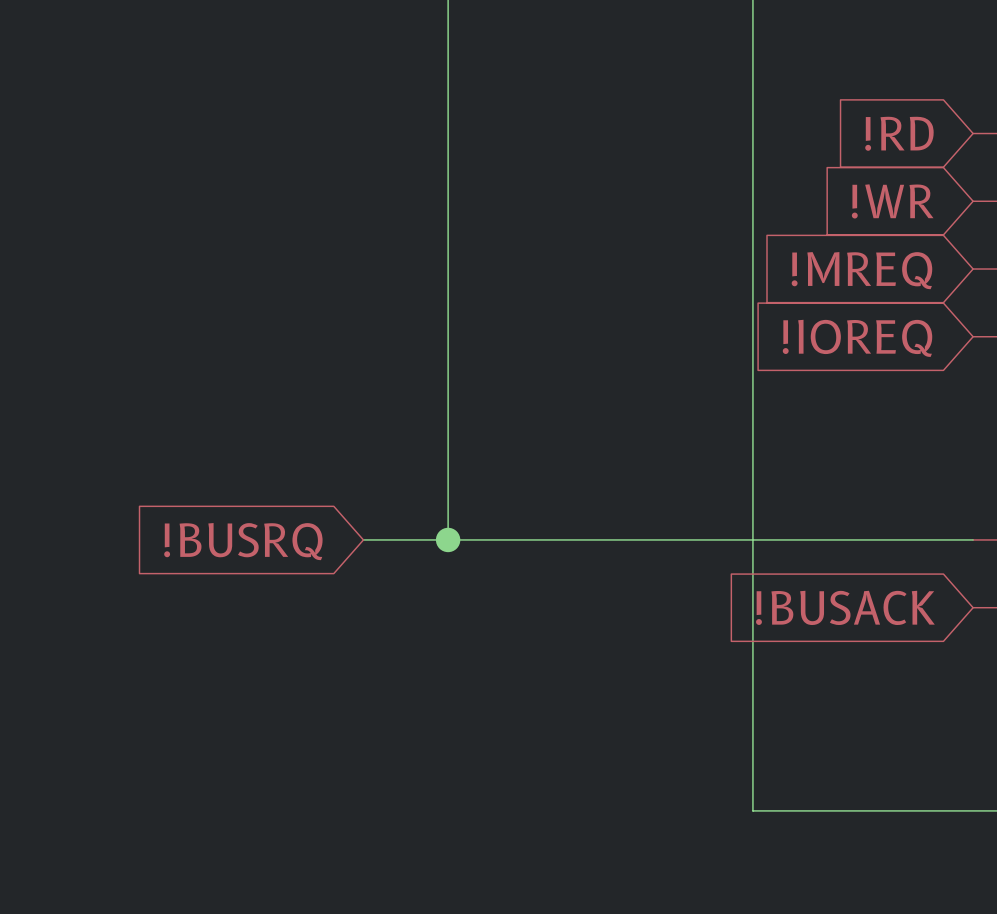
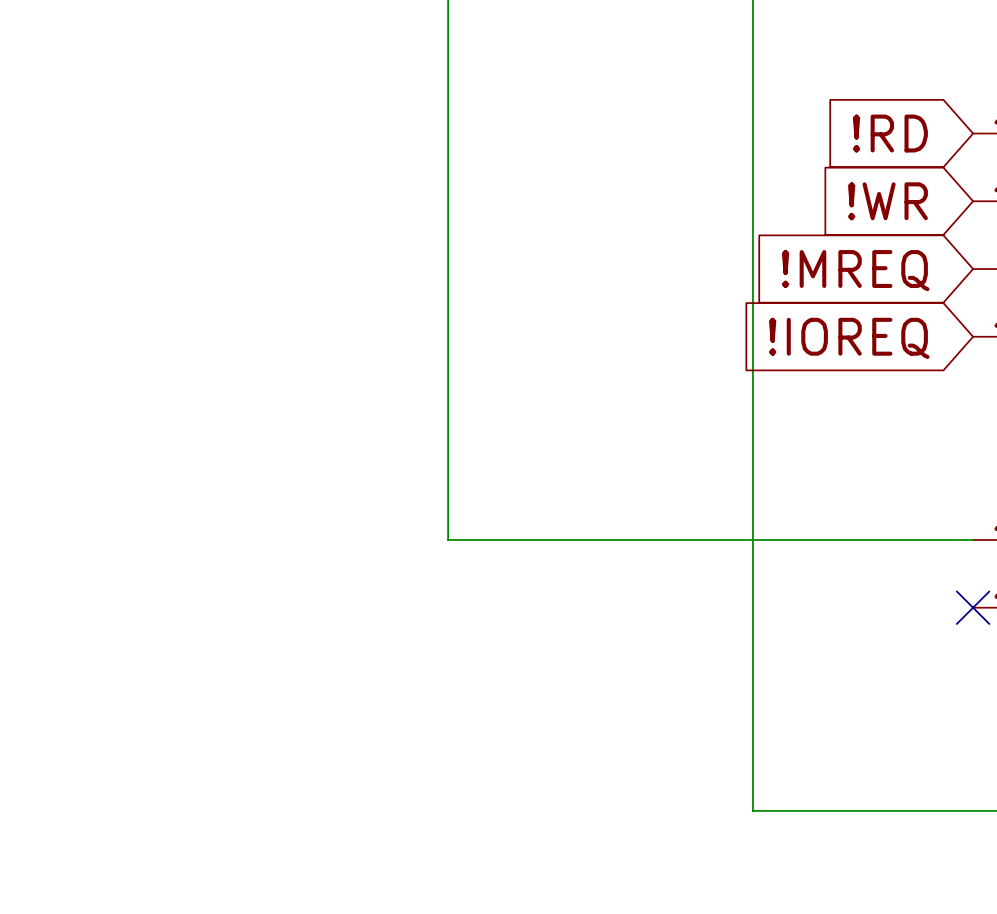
wire: (363, 539) (448, 539) -> none
junction: (448, 539) -> none
global label: !BUSRQ (243, 541) -> none
global label: !BUSACK (845, 607) -> none
no-connect mark: none -> (973, 607)

